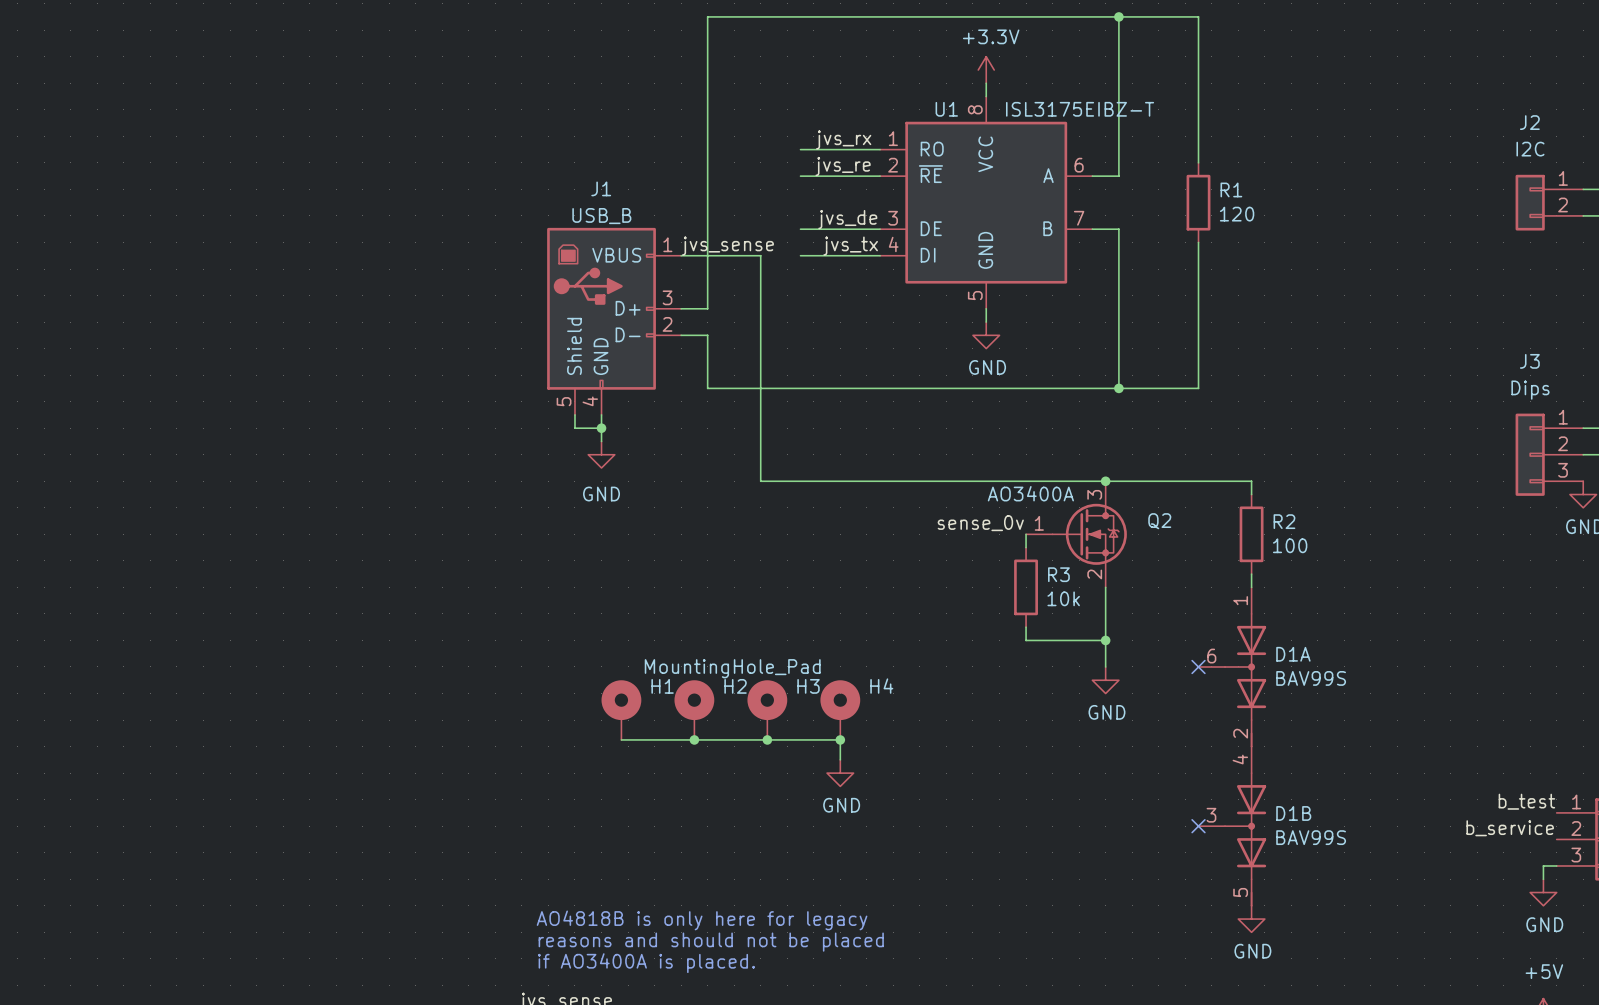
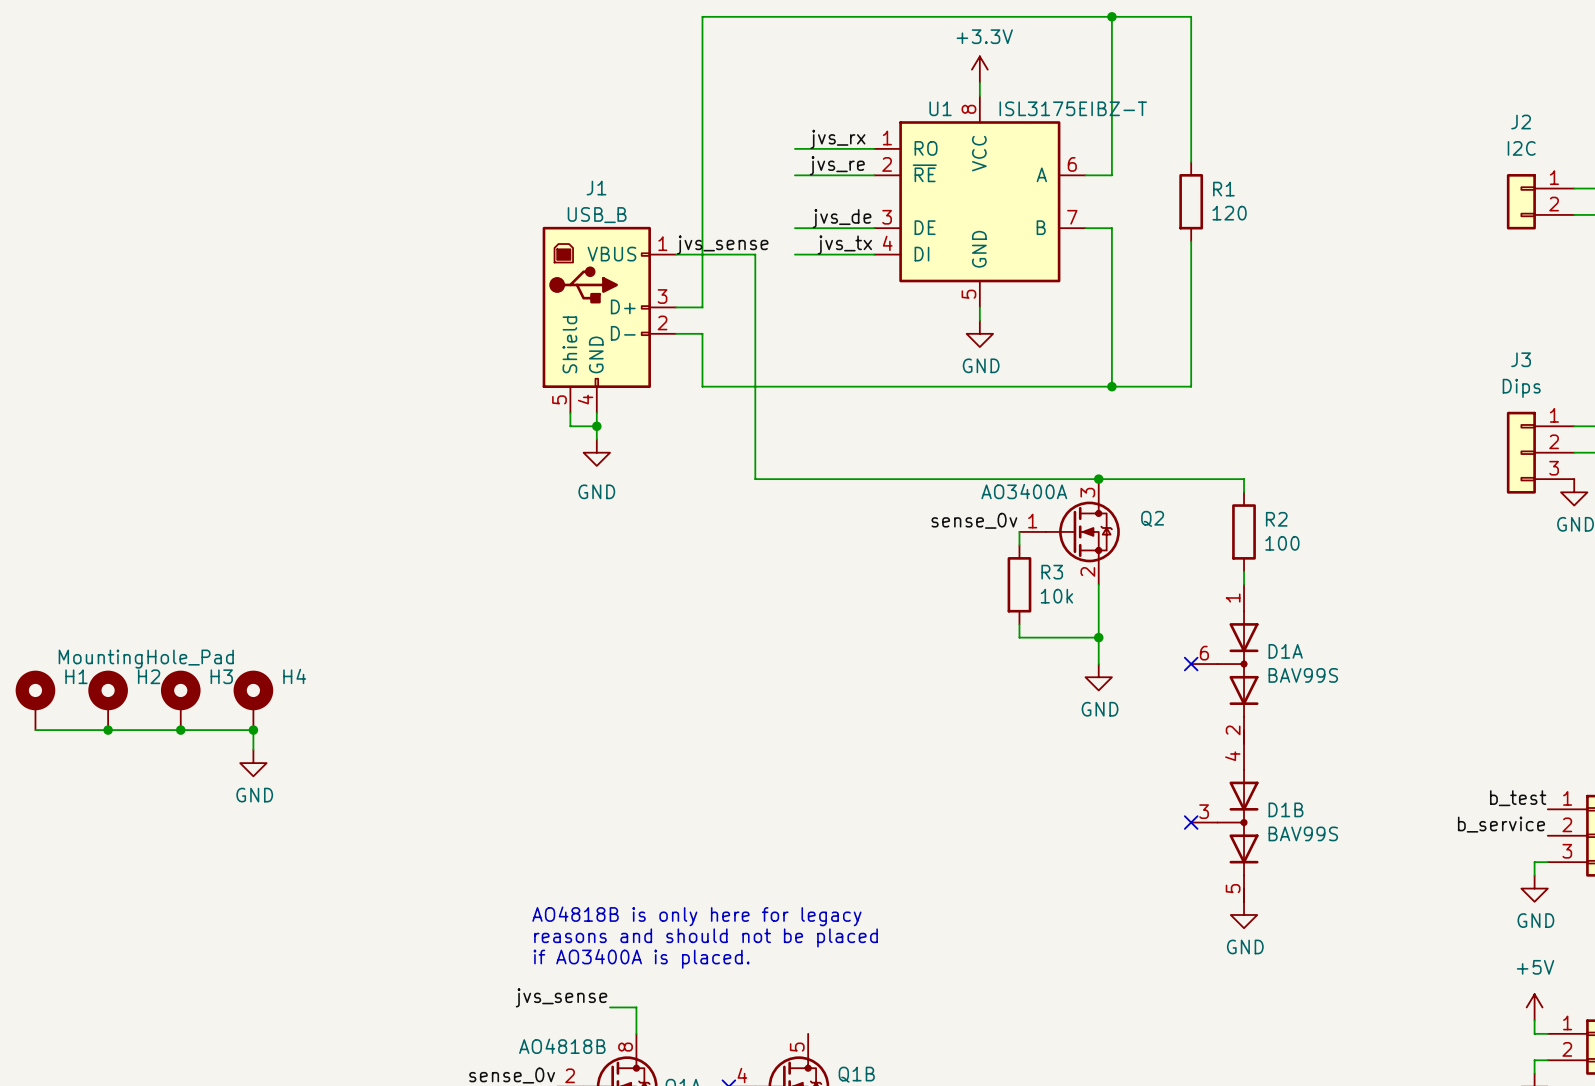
H1 position: (621, 710) -> (35, 700)
H2 position: (694, 710) -> (108, 700)
H3 position: (767, 710) -> (180, 700)
H4 position: (840, 710) -> (253, 700)
wire: none -> (35, 730) (253, 730) (253, 749)
junction: none -> (108, 730)
junction: none -> (180, 730)
junction: none -> (253, 730)
wire: (621, 739) (840, 739) (840, 759) -> none
junction: (694, 739) -> none
junction: (767, 739) -> none
junction: (840, 739) -> none
power symbol: none -> GND (253, 763)
power symbol: GND (840, 773) -> none

